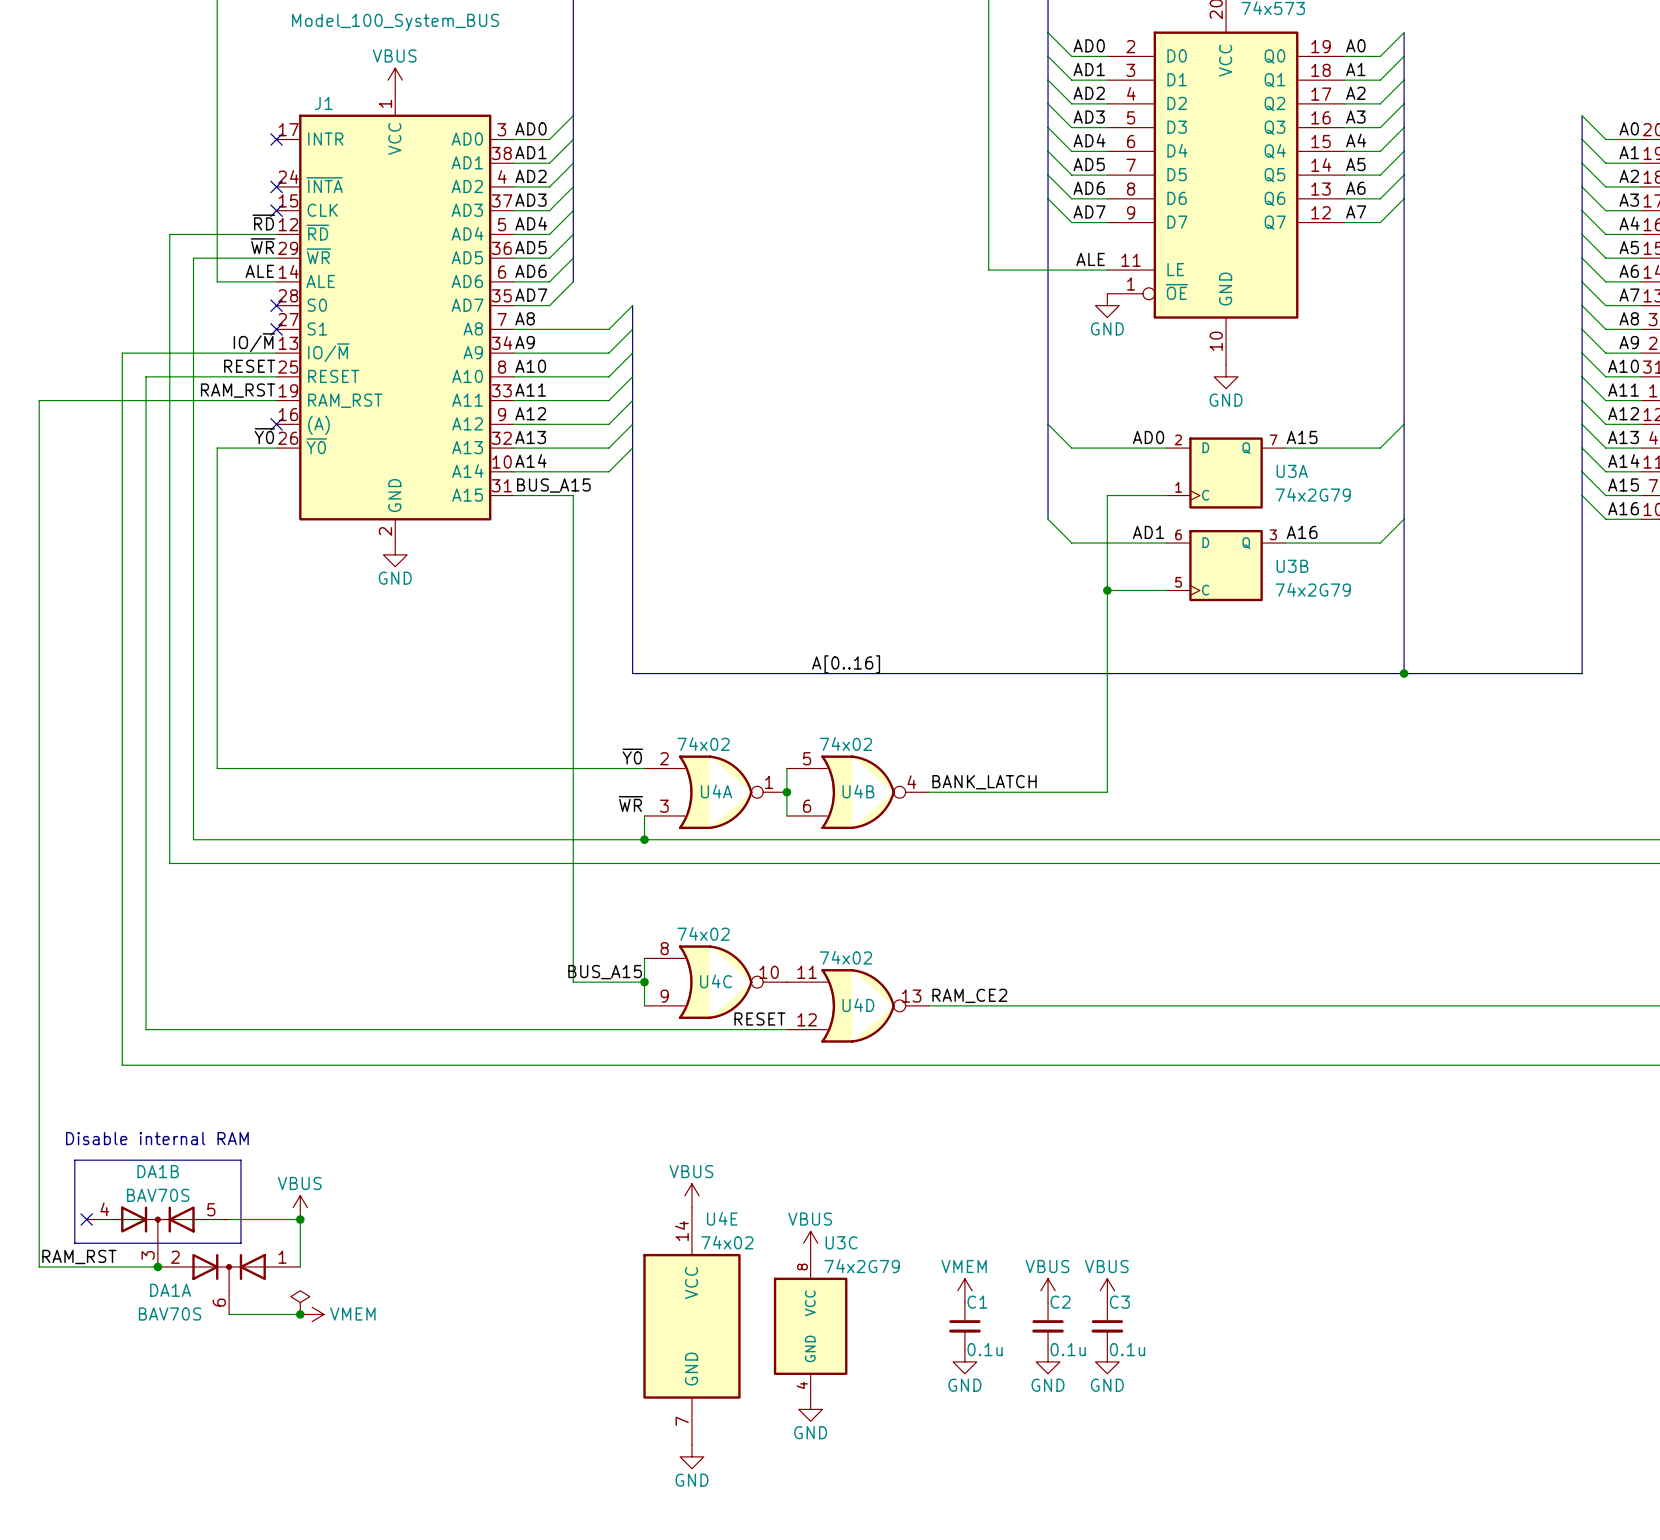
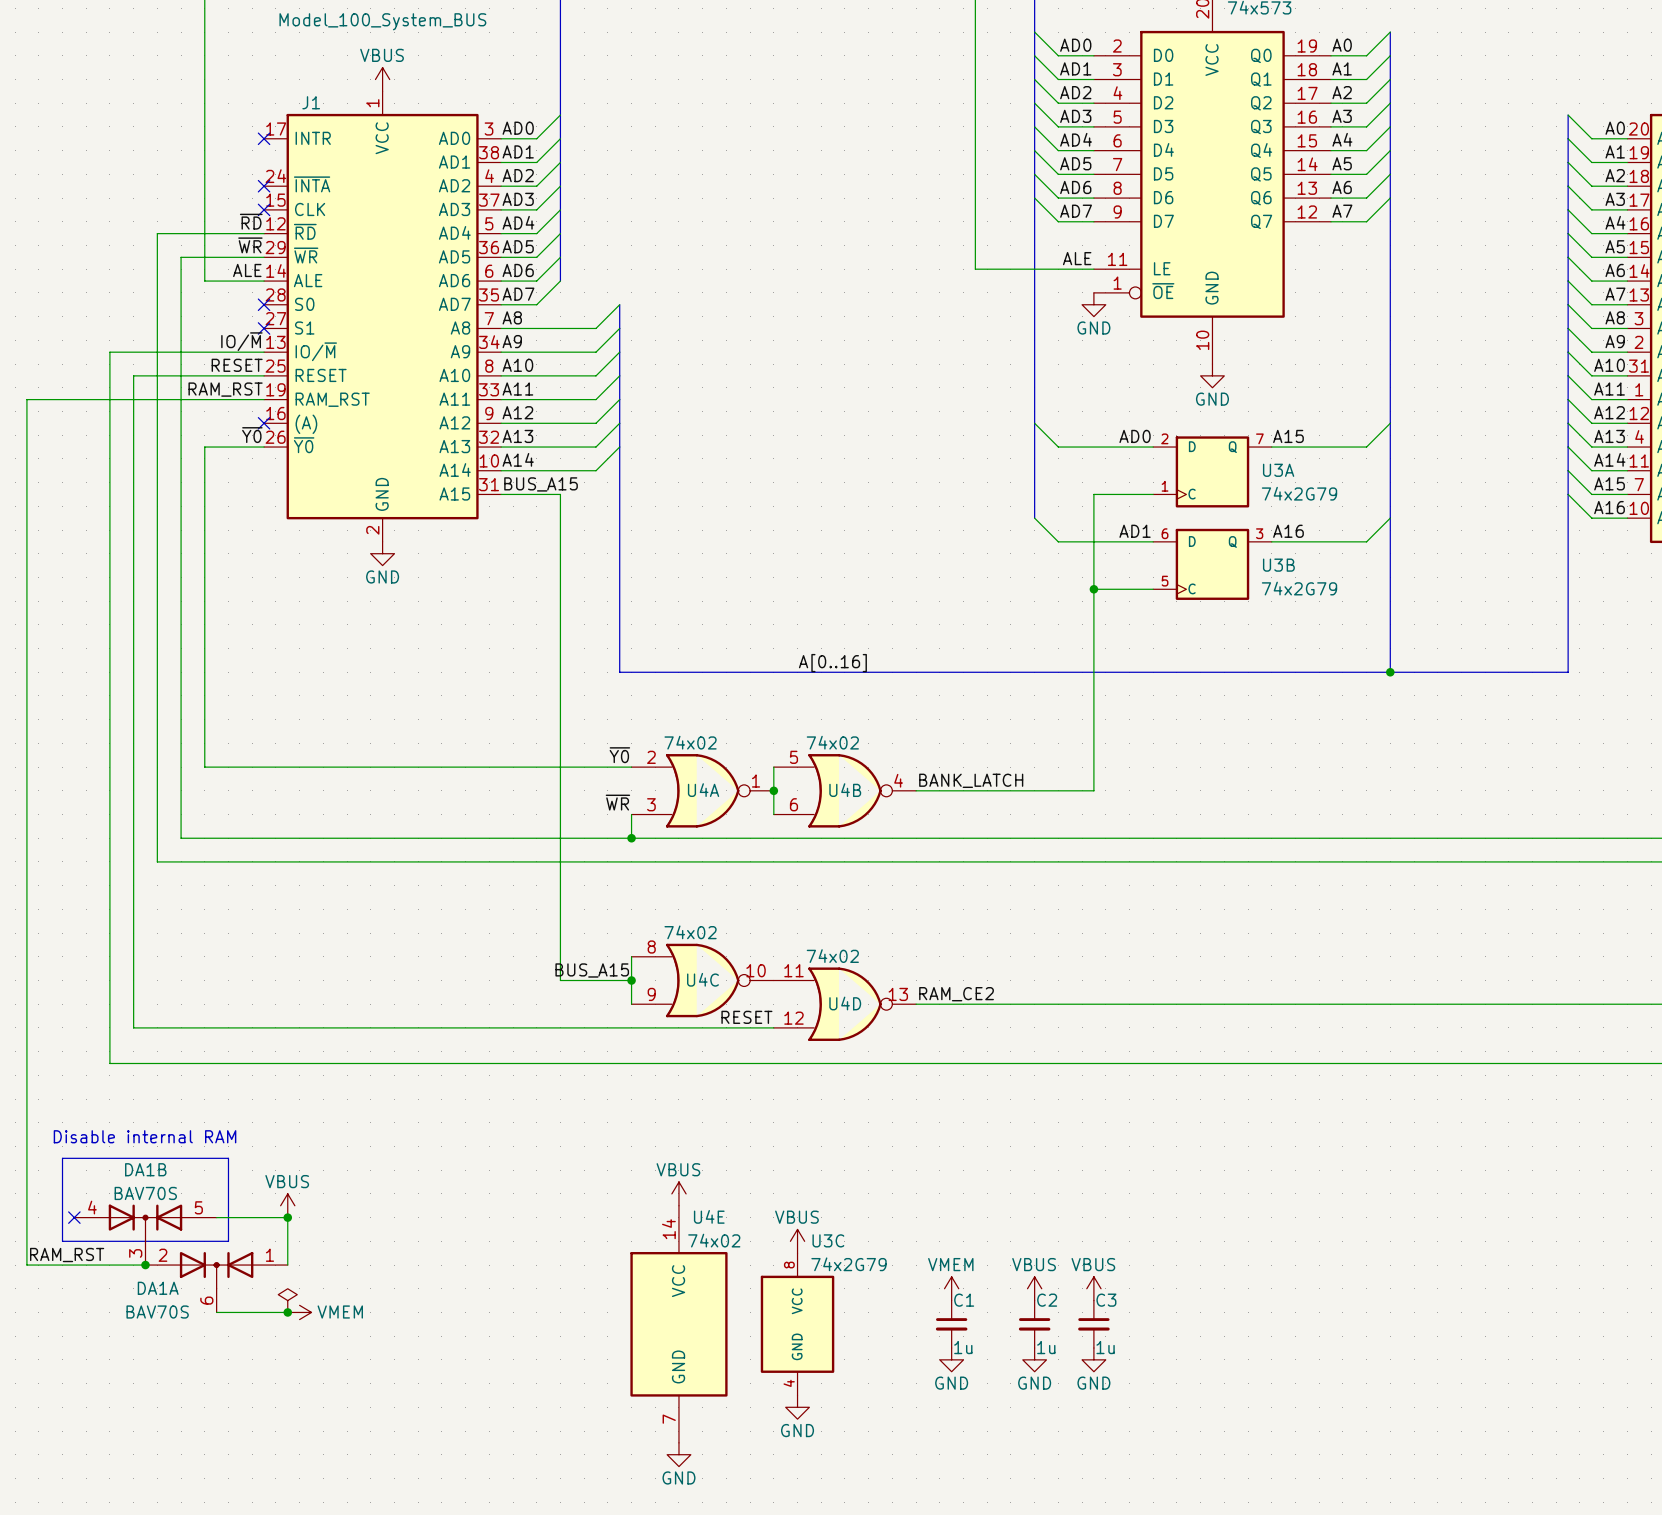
C1 value: 0.1u (985, 1349) -> 1u (963, 1347)
C2 value: 0.1u (1068, 1349) -> 1u (1046, 1347)
C3 value: 0.1u (1127, 1349) -> 1u (1105, 1347)

